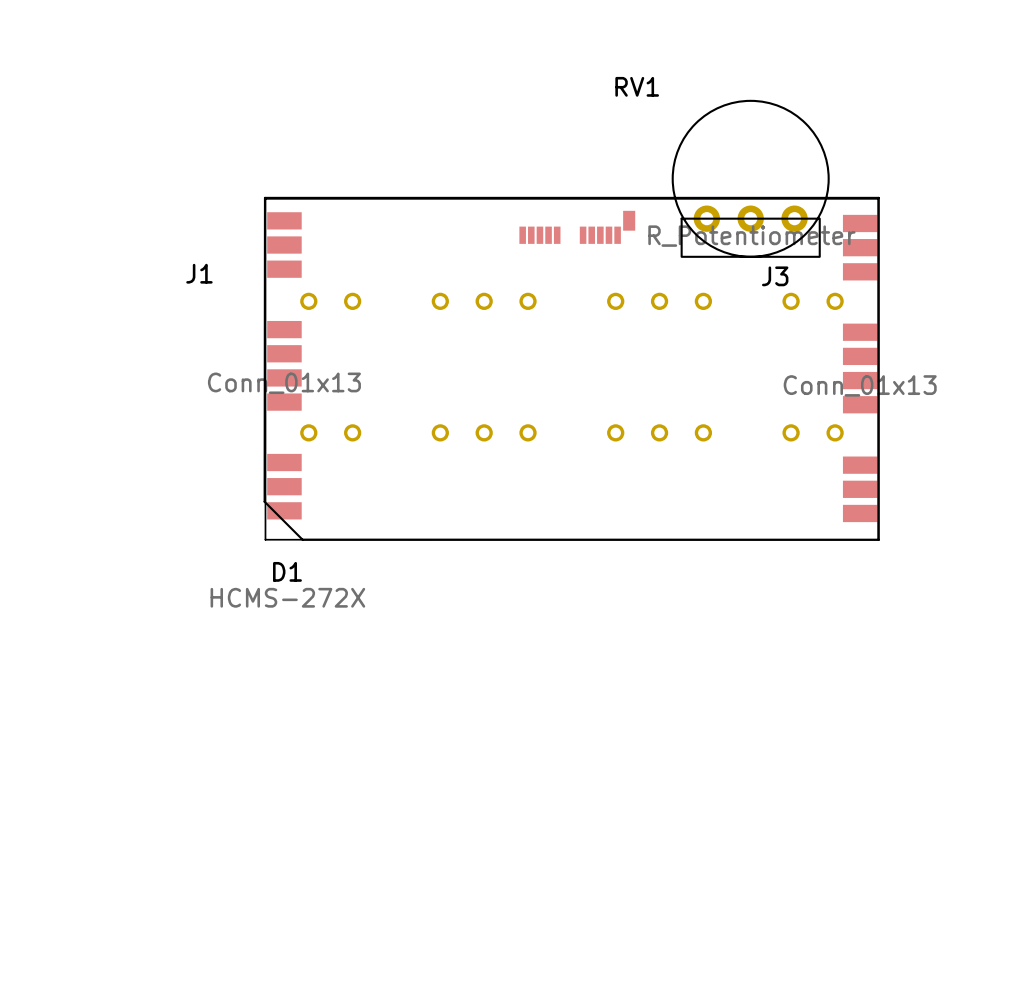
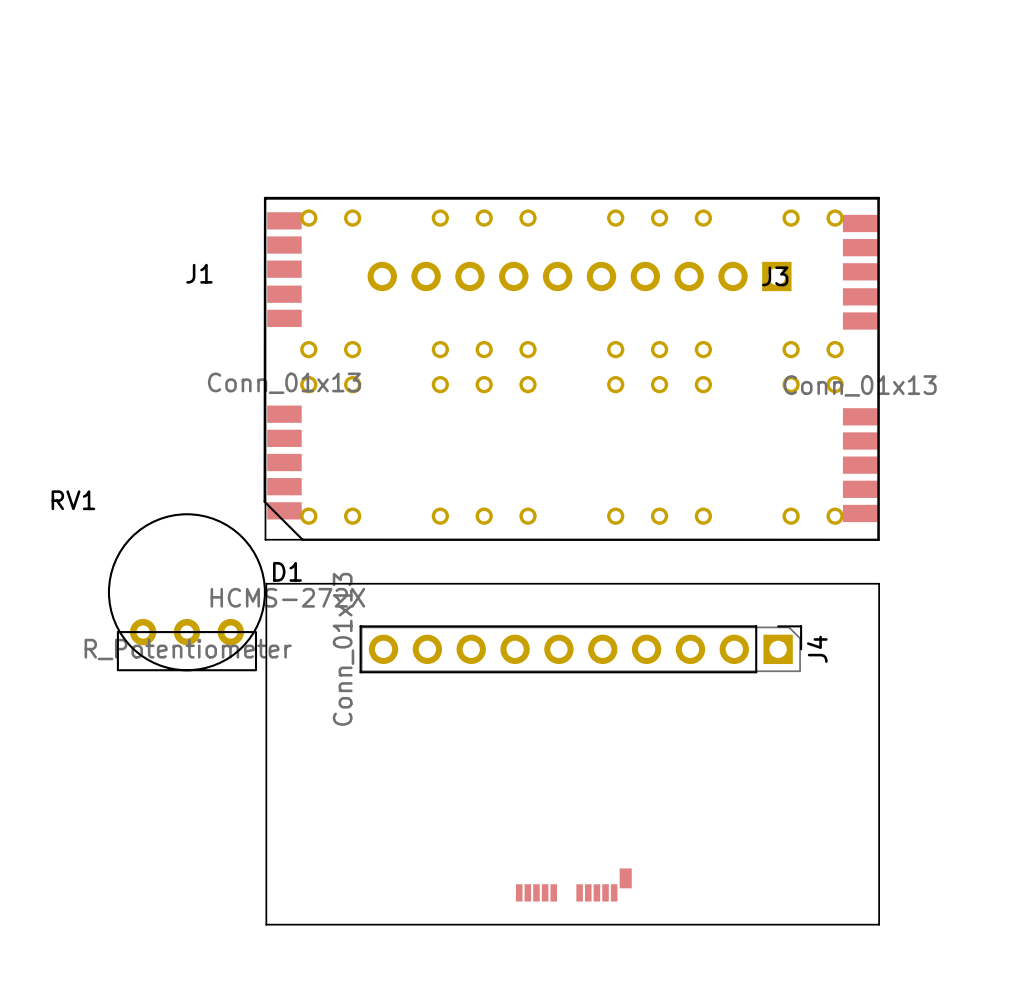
RV1 position: (750, 178) -> (186, 592)
D1 footprint: [263, 196, 880, 541] -> [263, 196, 880, 541]
J1 footprint: [267, 212, 302, 520] -> [267, 212, 302, 520]
J3 footprint: [842, 214, 878, 523] -> [842, 214, 878, 523]
part: (577, 227) -> none
part: none -> (579, 276)
board edge: none -> (266, 583) (879, 583) (879, 924) (266, 924) (266, 583)
J4: none -> Conn_01x13 (580, 649)
part: none -> (573, 884)

